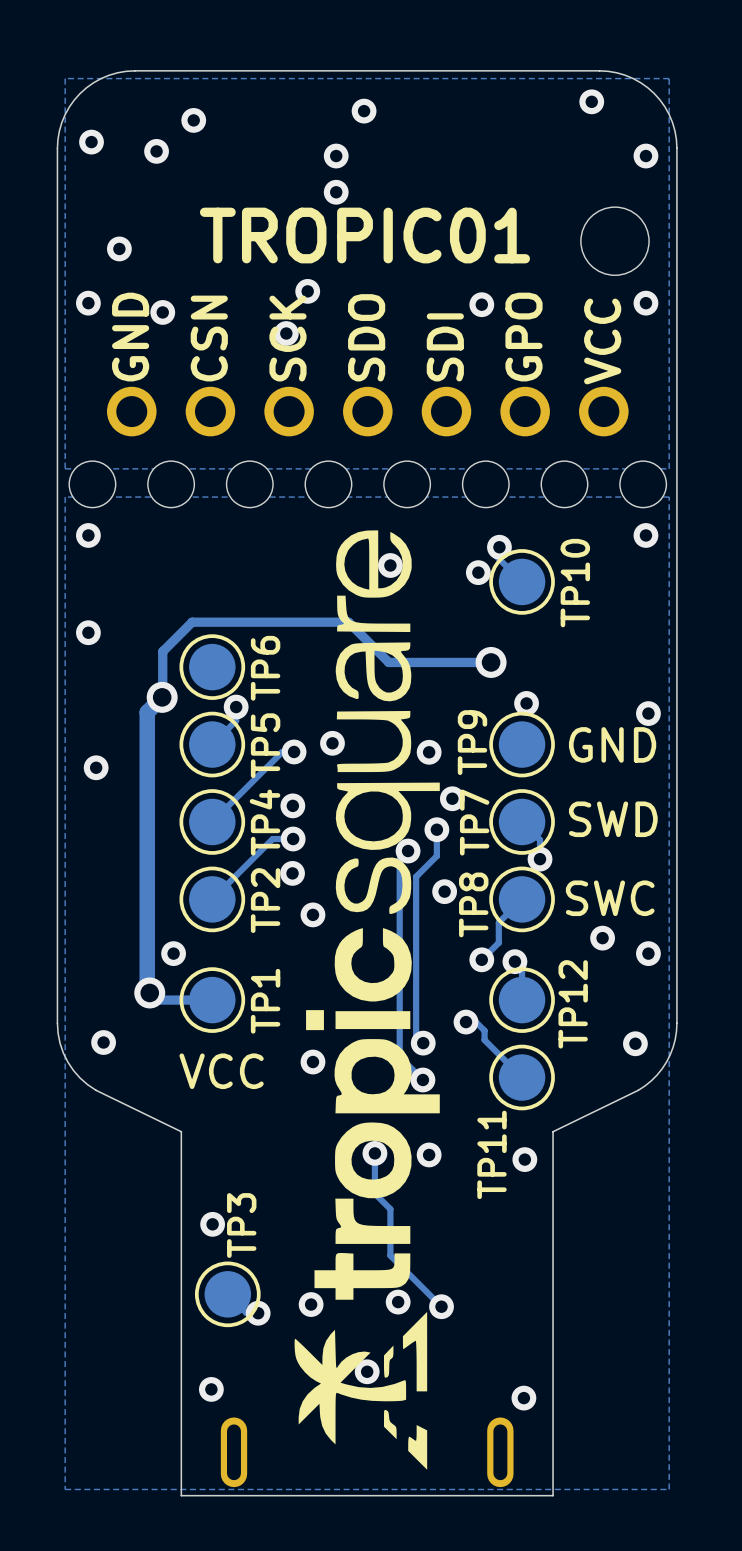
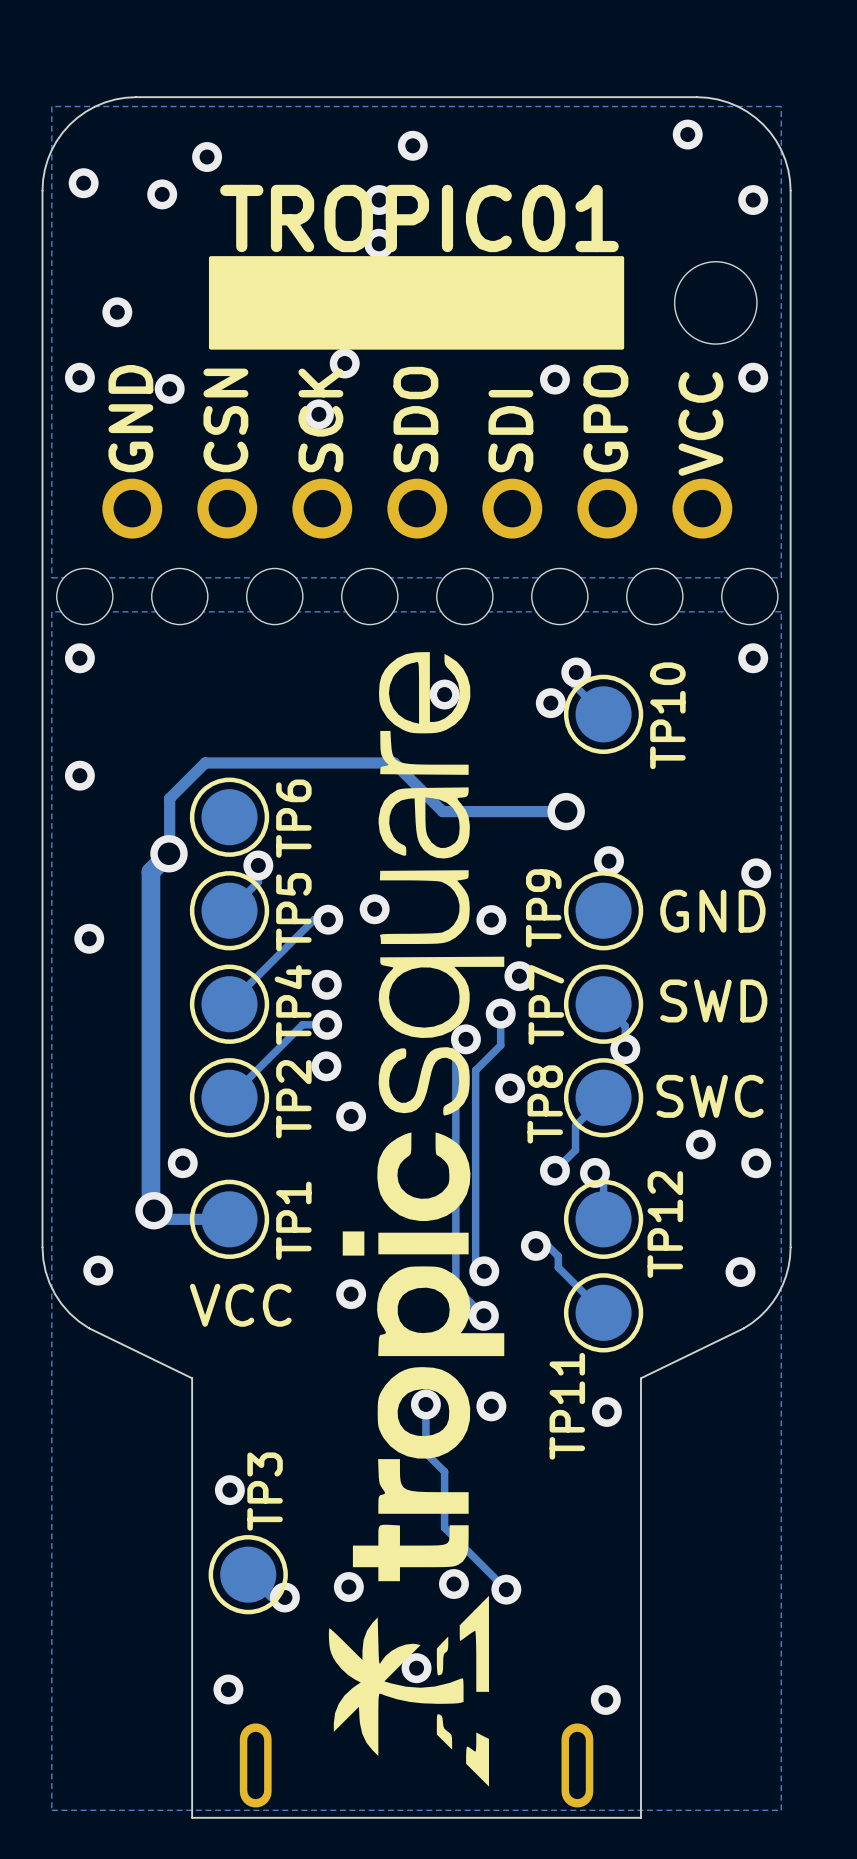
drawing: none -> [208, 256, 625, 350]
text position: TROPIC01 (364, 235) -> TROPIC01 (419, 218)

